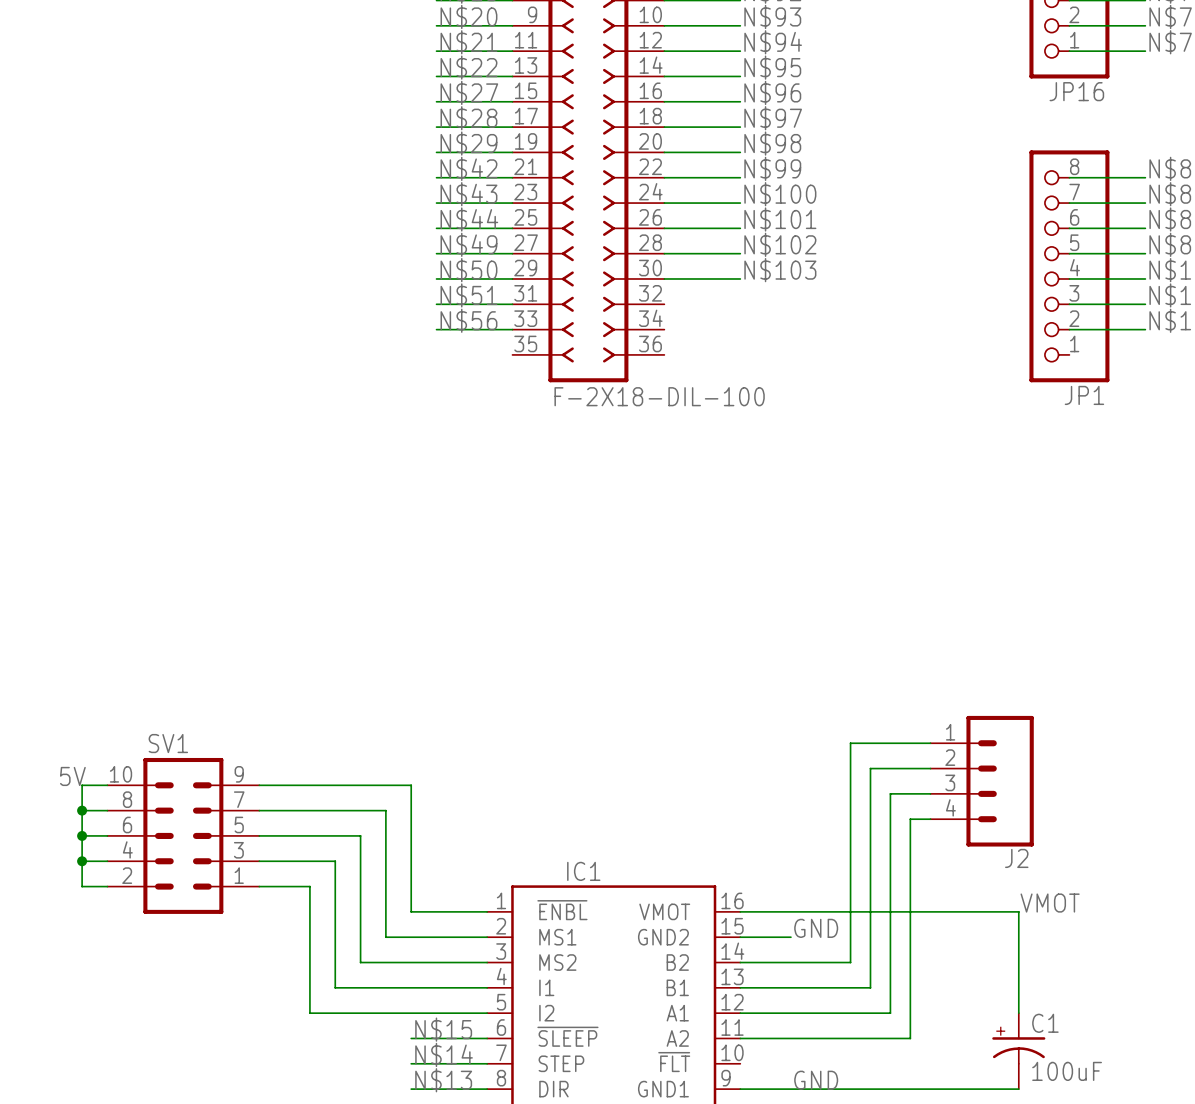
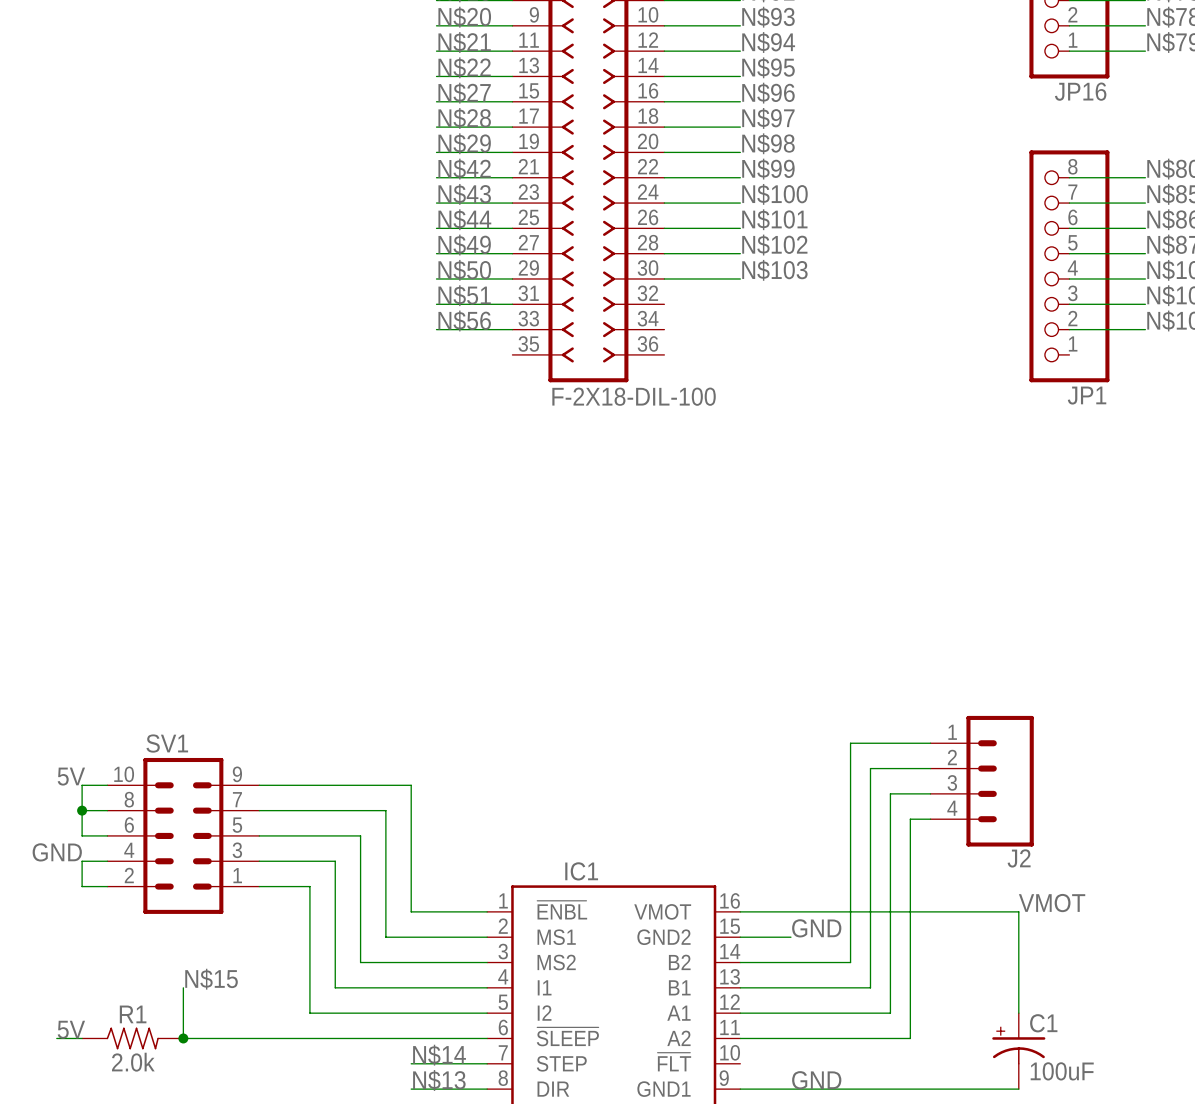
wire: (82, 835) (82, 861) -> none
junction: (82, 835) -> none
label: none -> GND (57, 852)
junction: (82, 861) -> none
wire: none -> (183, 987) (183, 1038) (411, 1038)
label: none -> 5V (71, 1029)
label position: N$15 (443, 1029) -> N$15 (211, 979)
wire: none -> (56, 1038) (82, 1038)
R1: none -> 2.0k (132, 1038)
junction: none -> (183, 1038)

